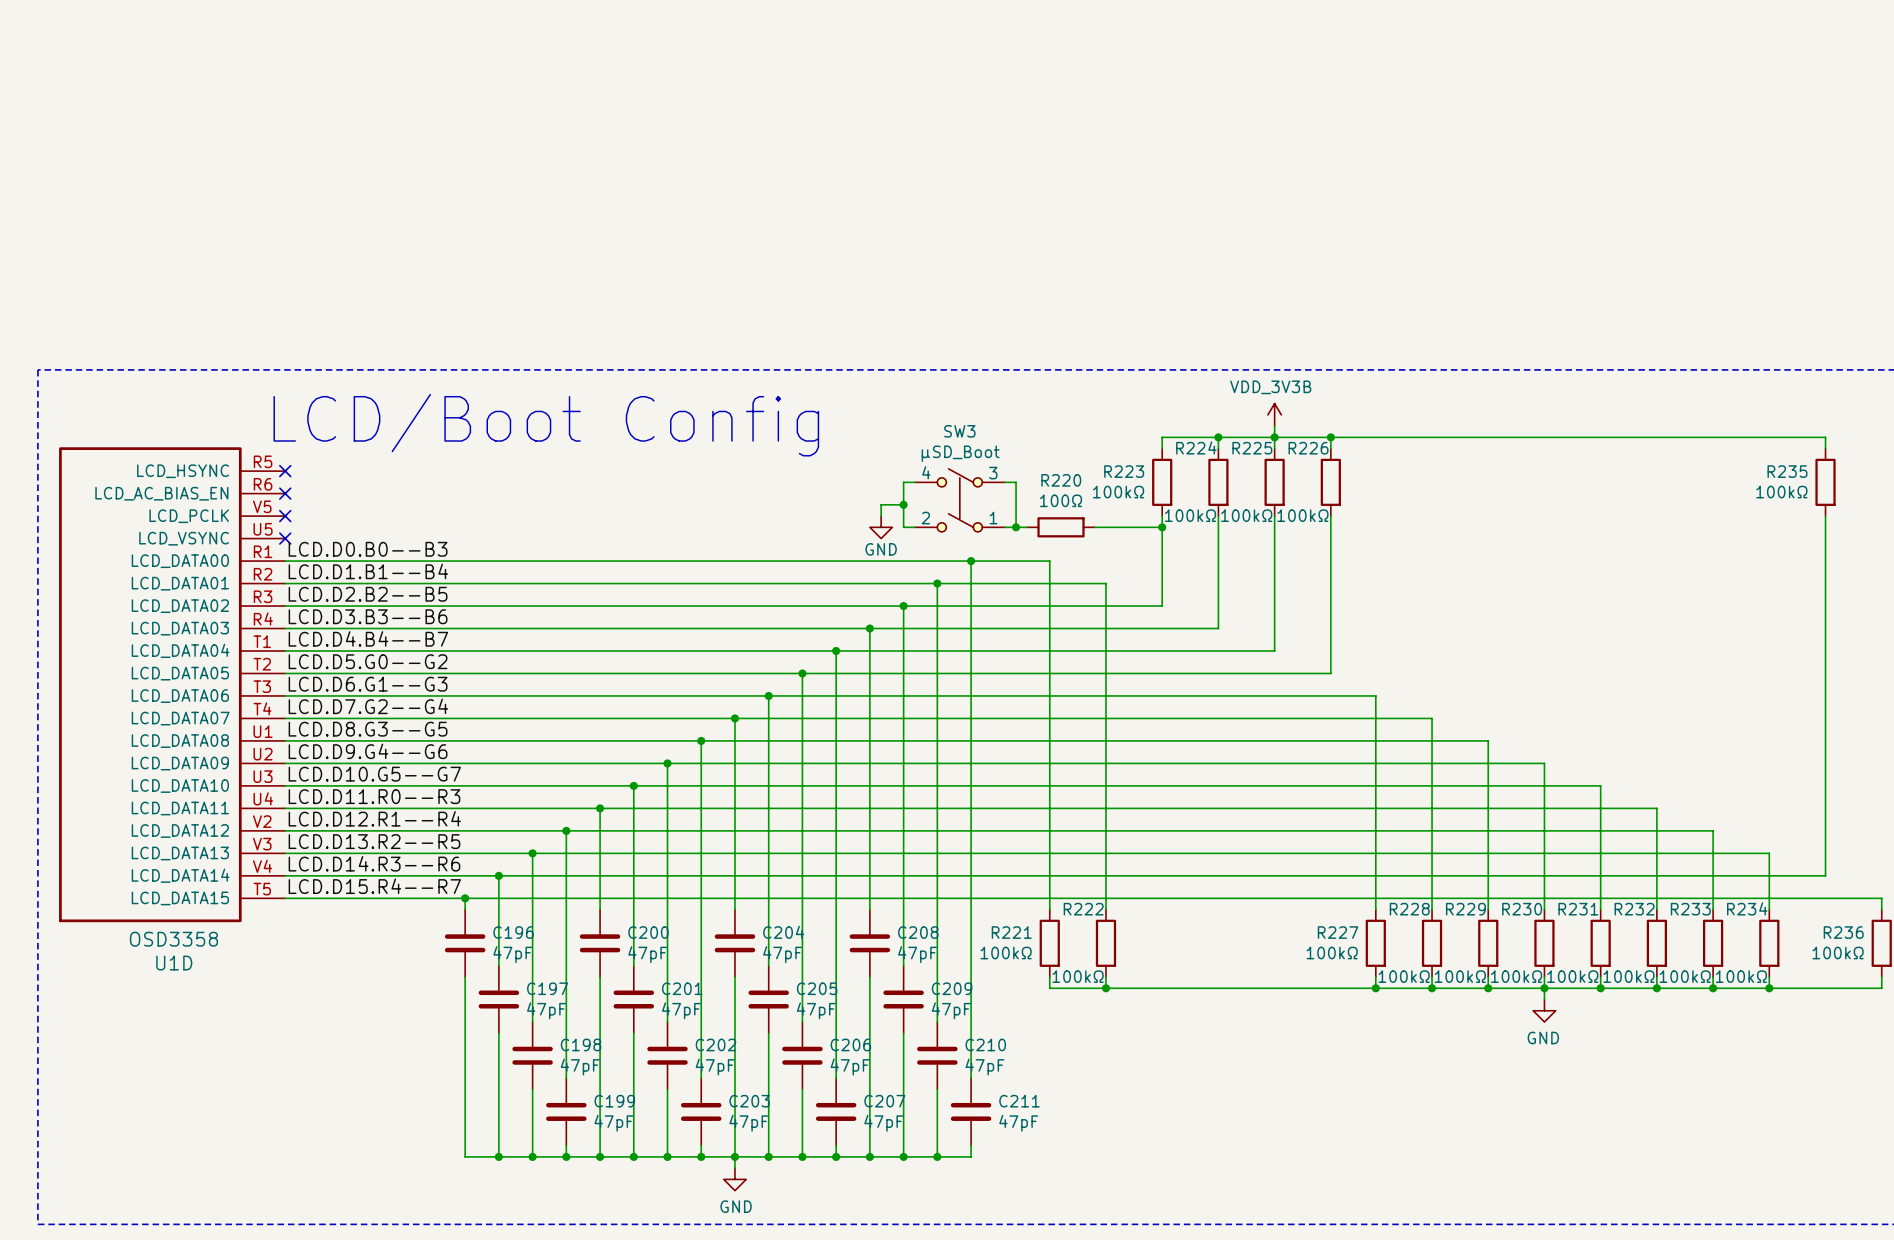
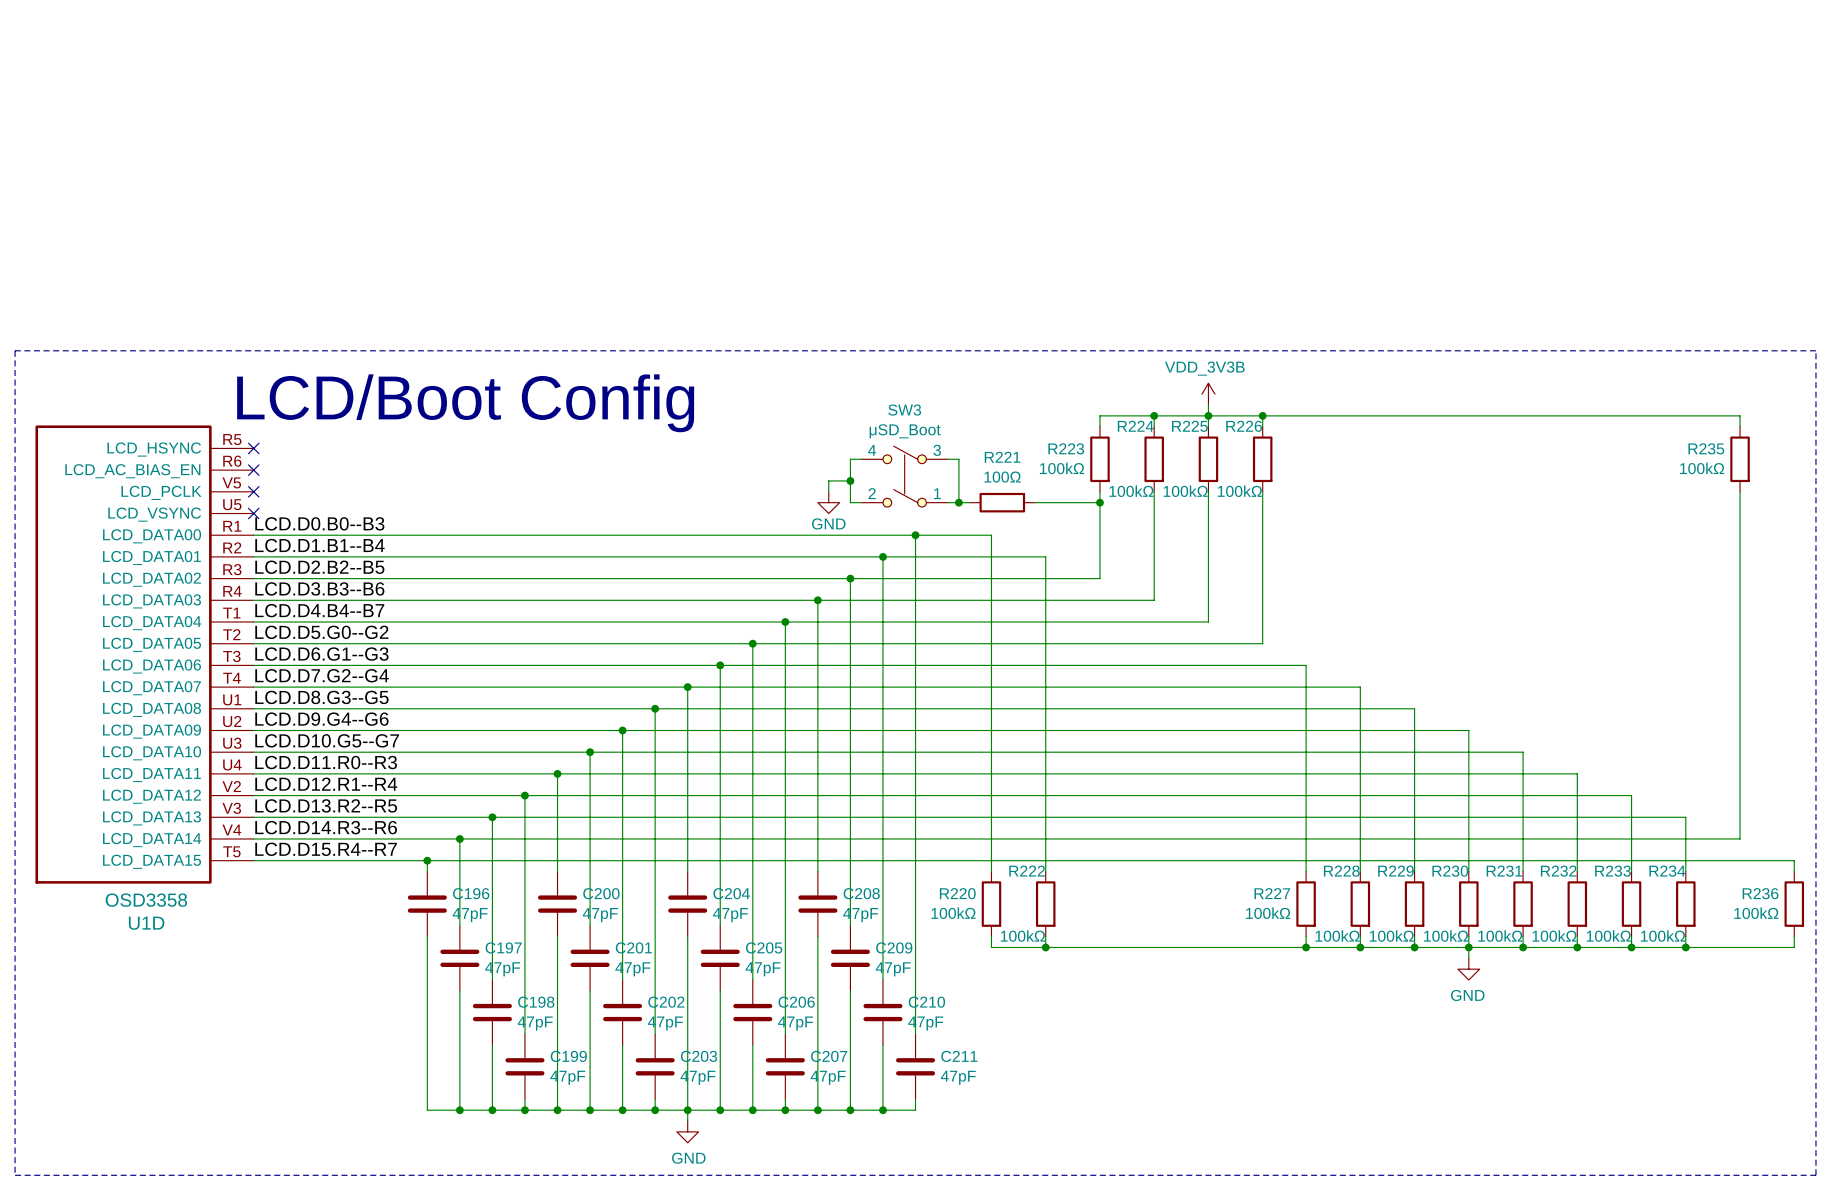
R220 name: R220 (1061, 480) -> R221 (1002, 457)
R221 name: R221 (1011, 932) -> R220 (957, 893)

